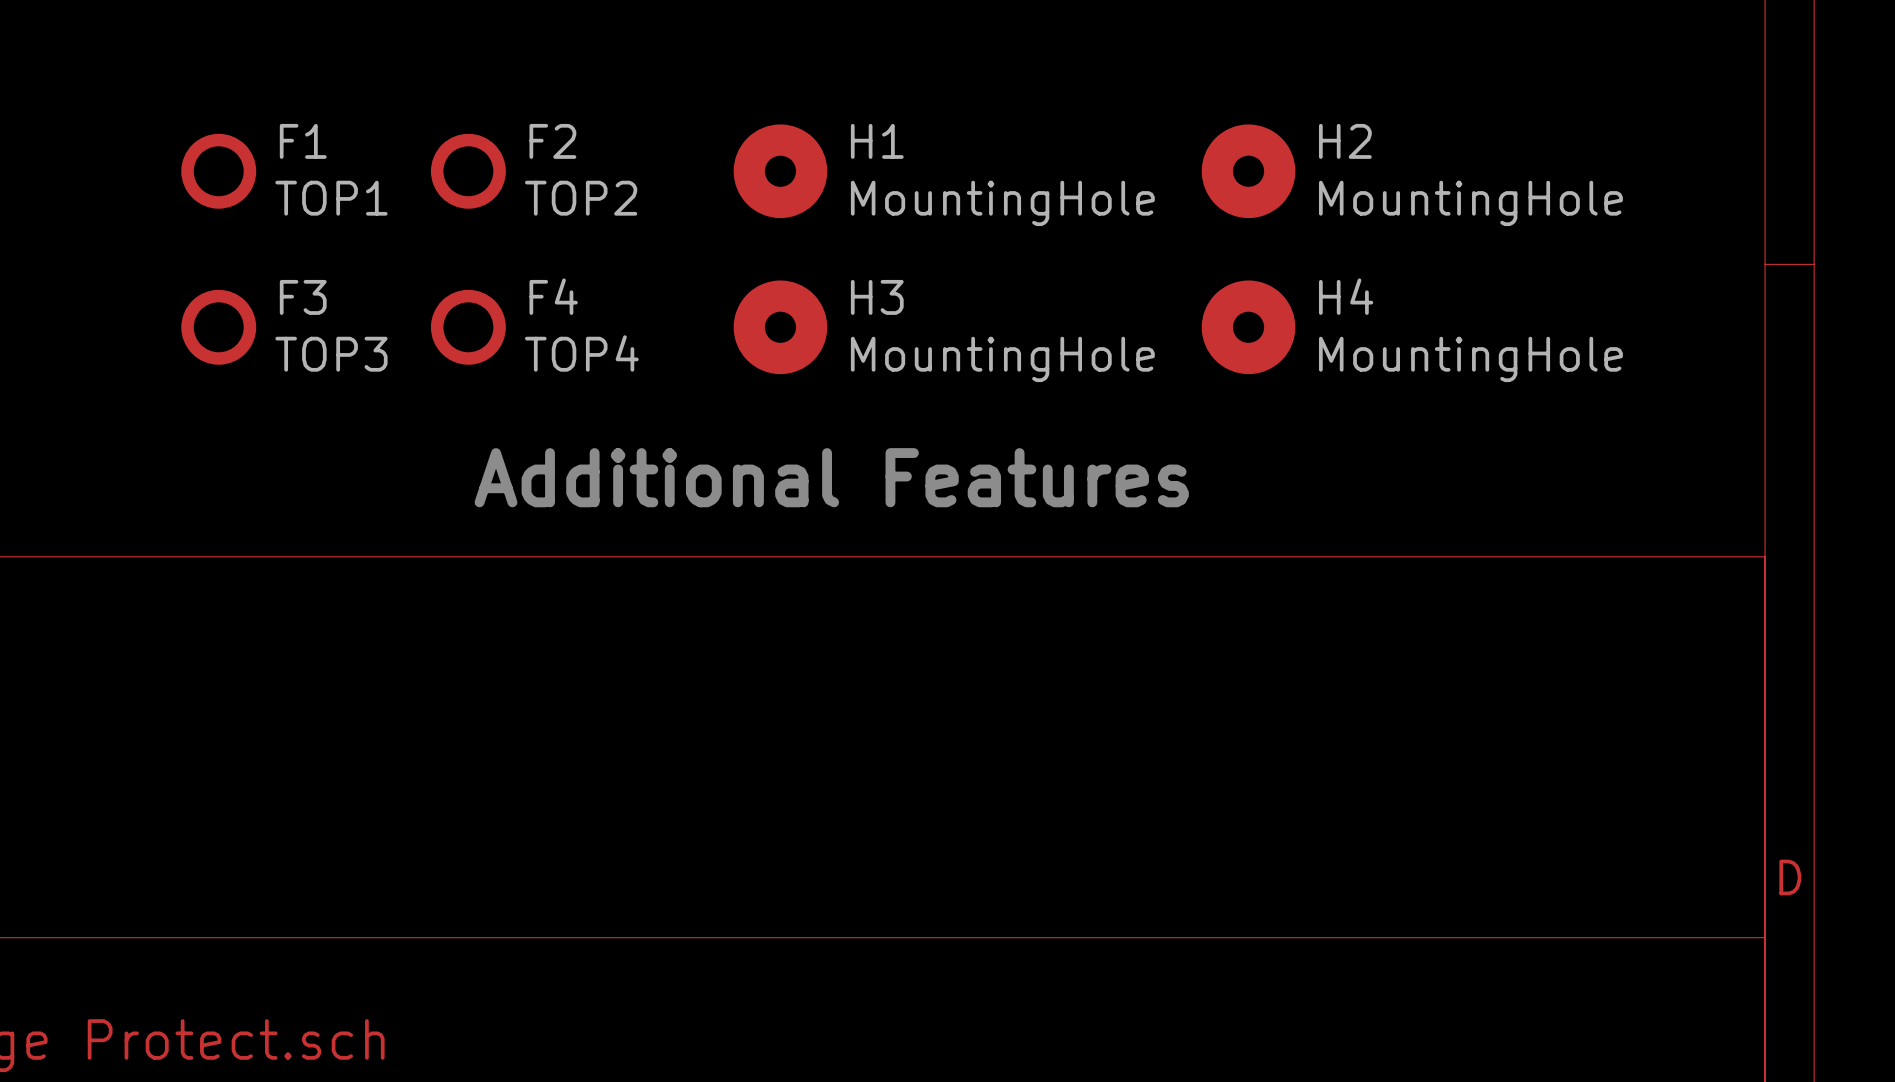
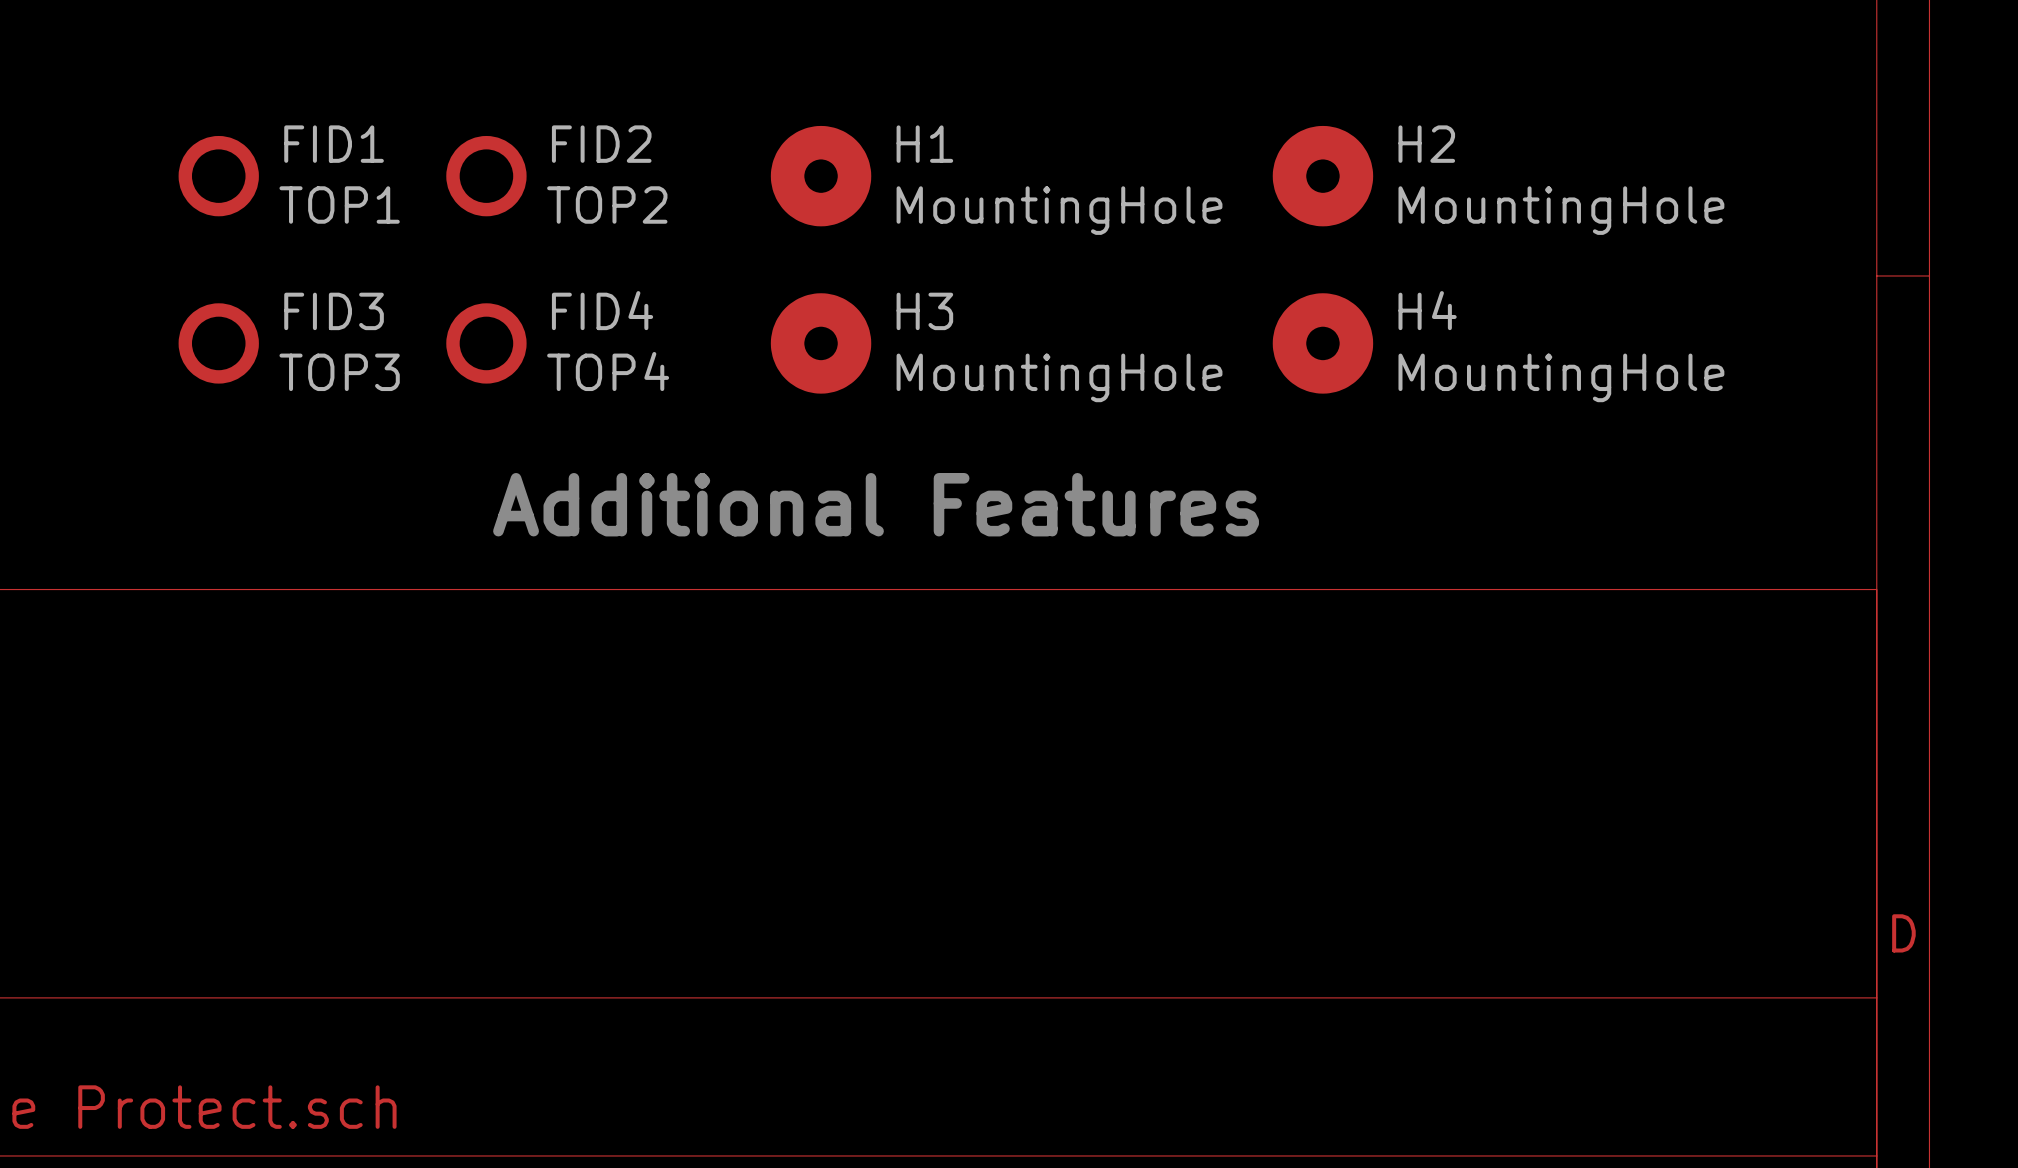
F1 name: F1 (303, 141) -> FID1 (334, 144)
F2 name: F2 (552, 141) -> FID2 (601, 144)
F4 name: F4 (553, 296) -> FID4 (602, 310)
F3 name: F3 (303, 297) -> FID3 (334, 311)

